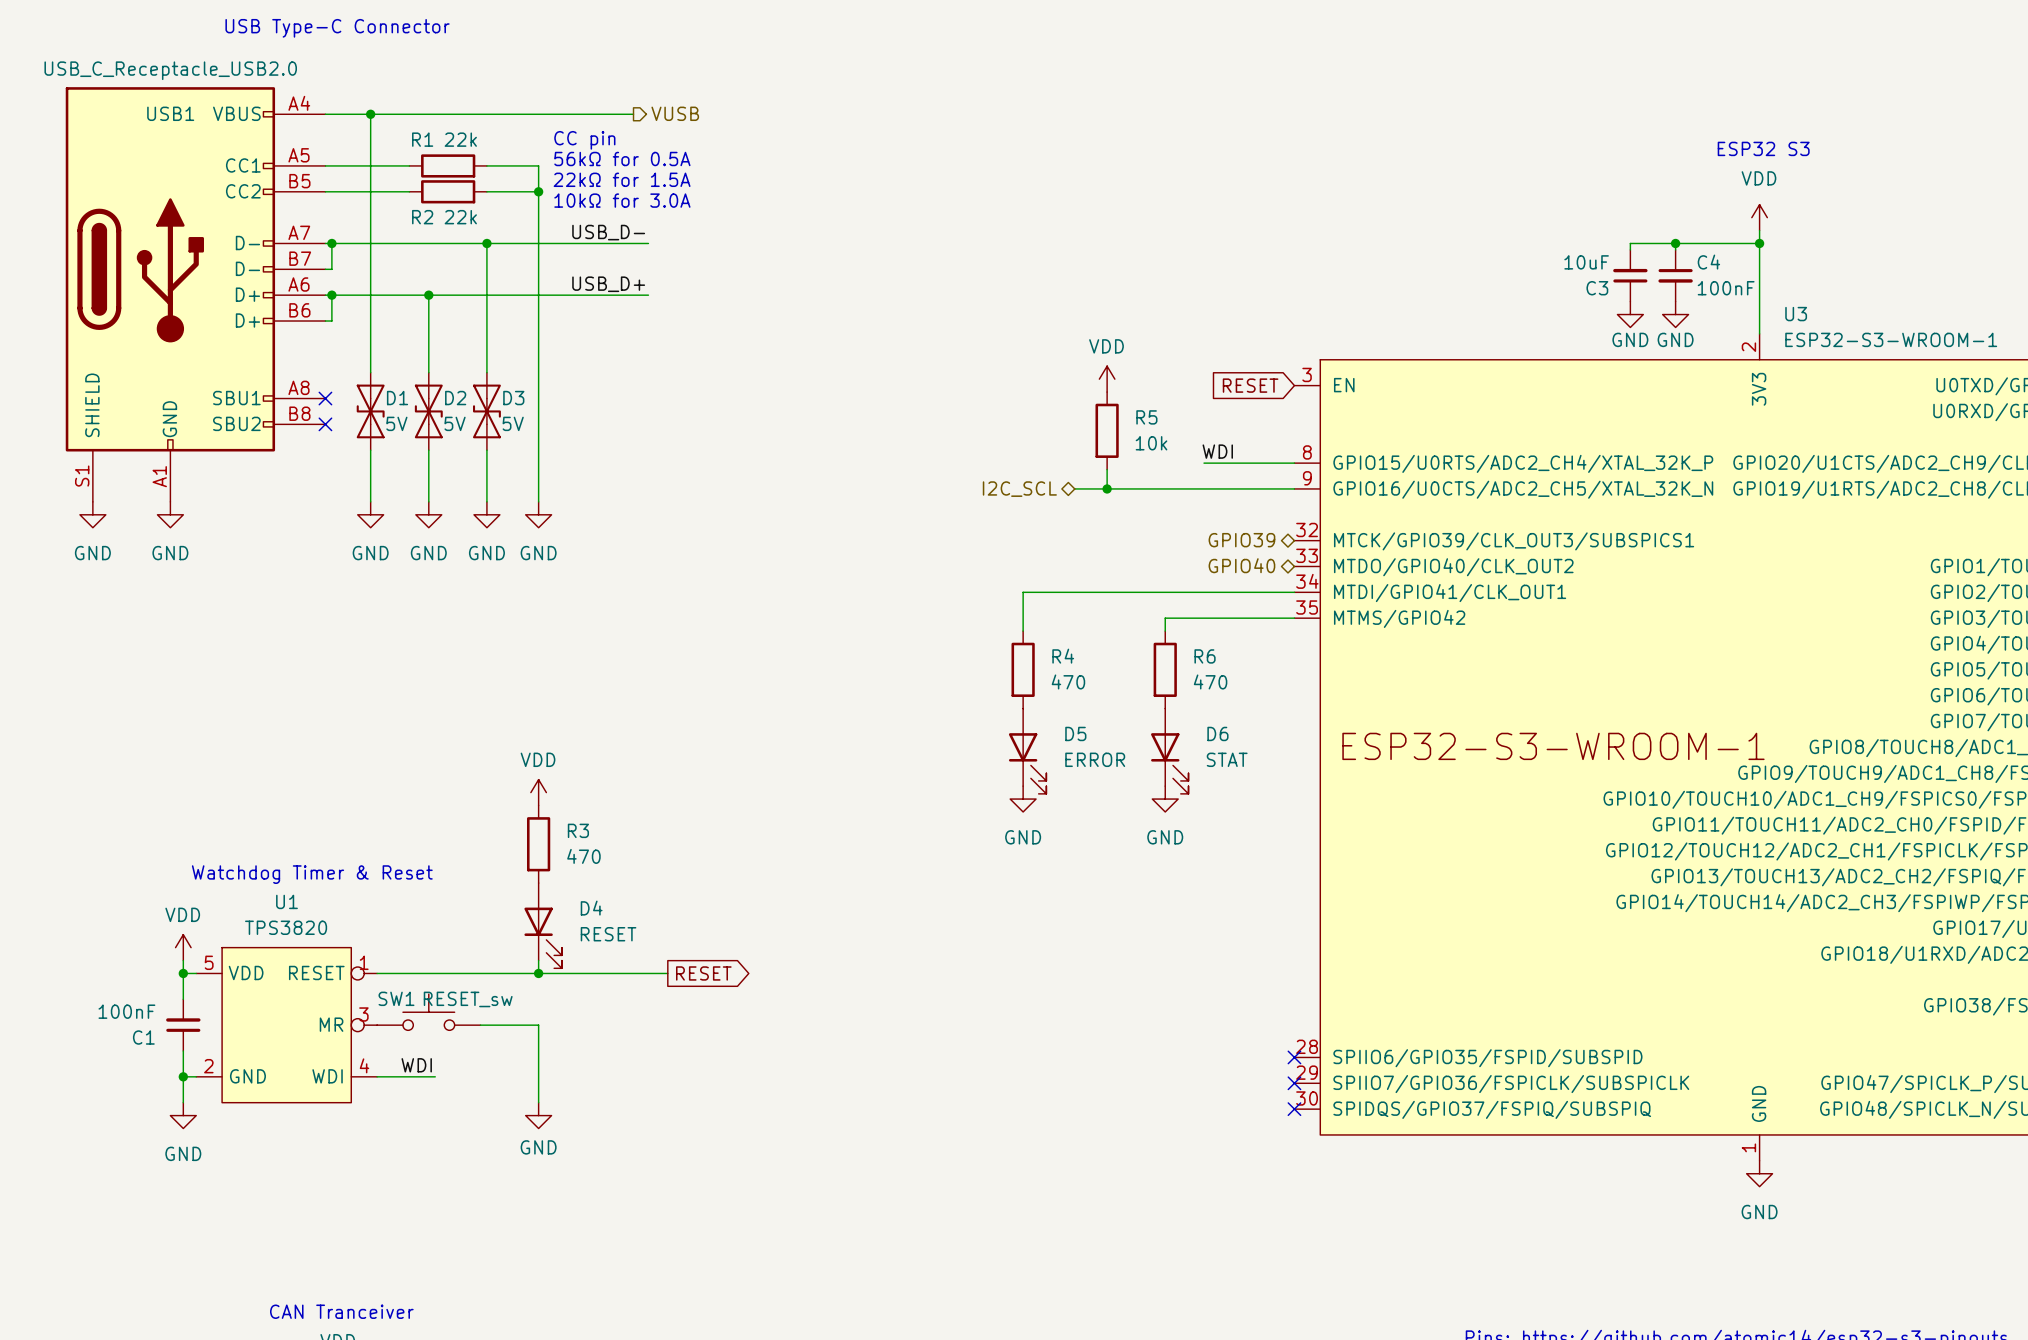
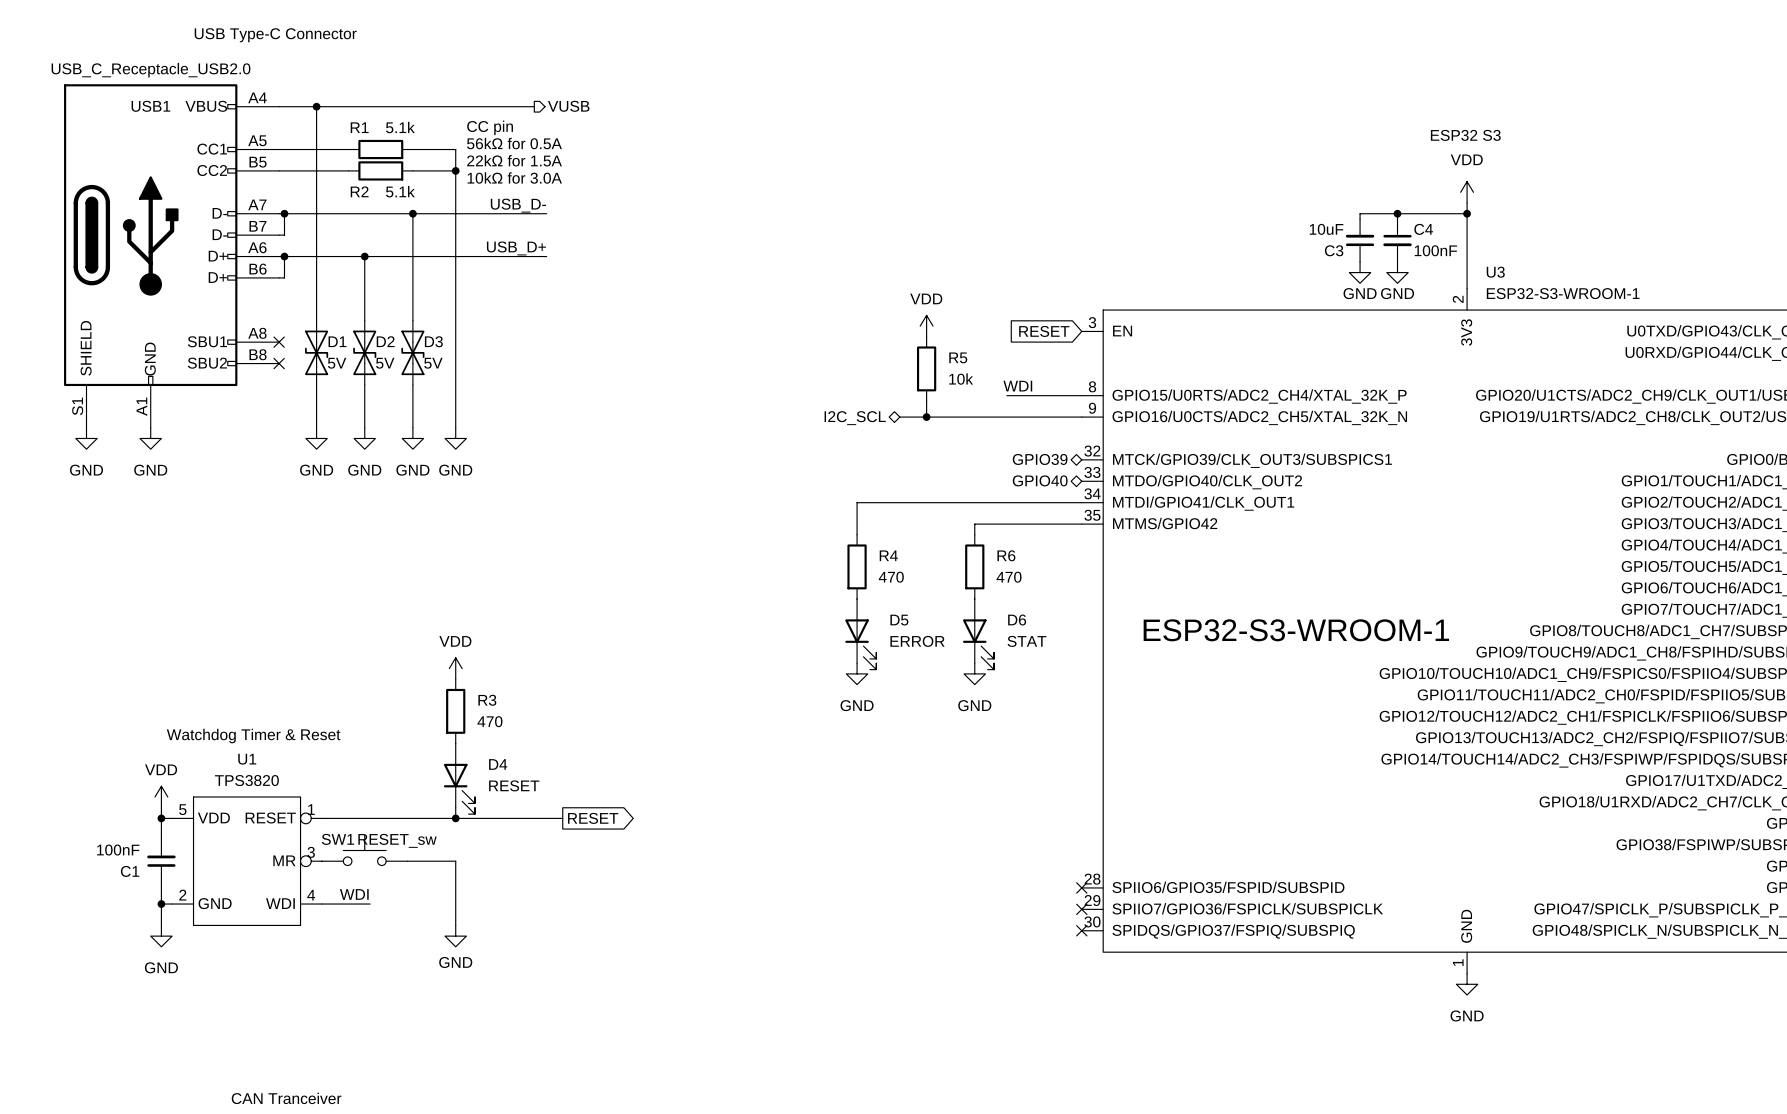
R1 value: 22k (460, 139) -> 5.1k (400, 127)
R2 value: 22k (460, 217) -> 5.1k (400, 191)

